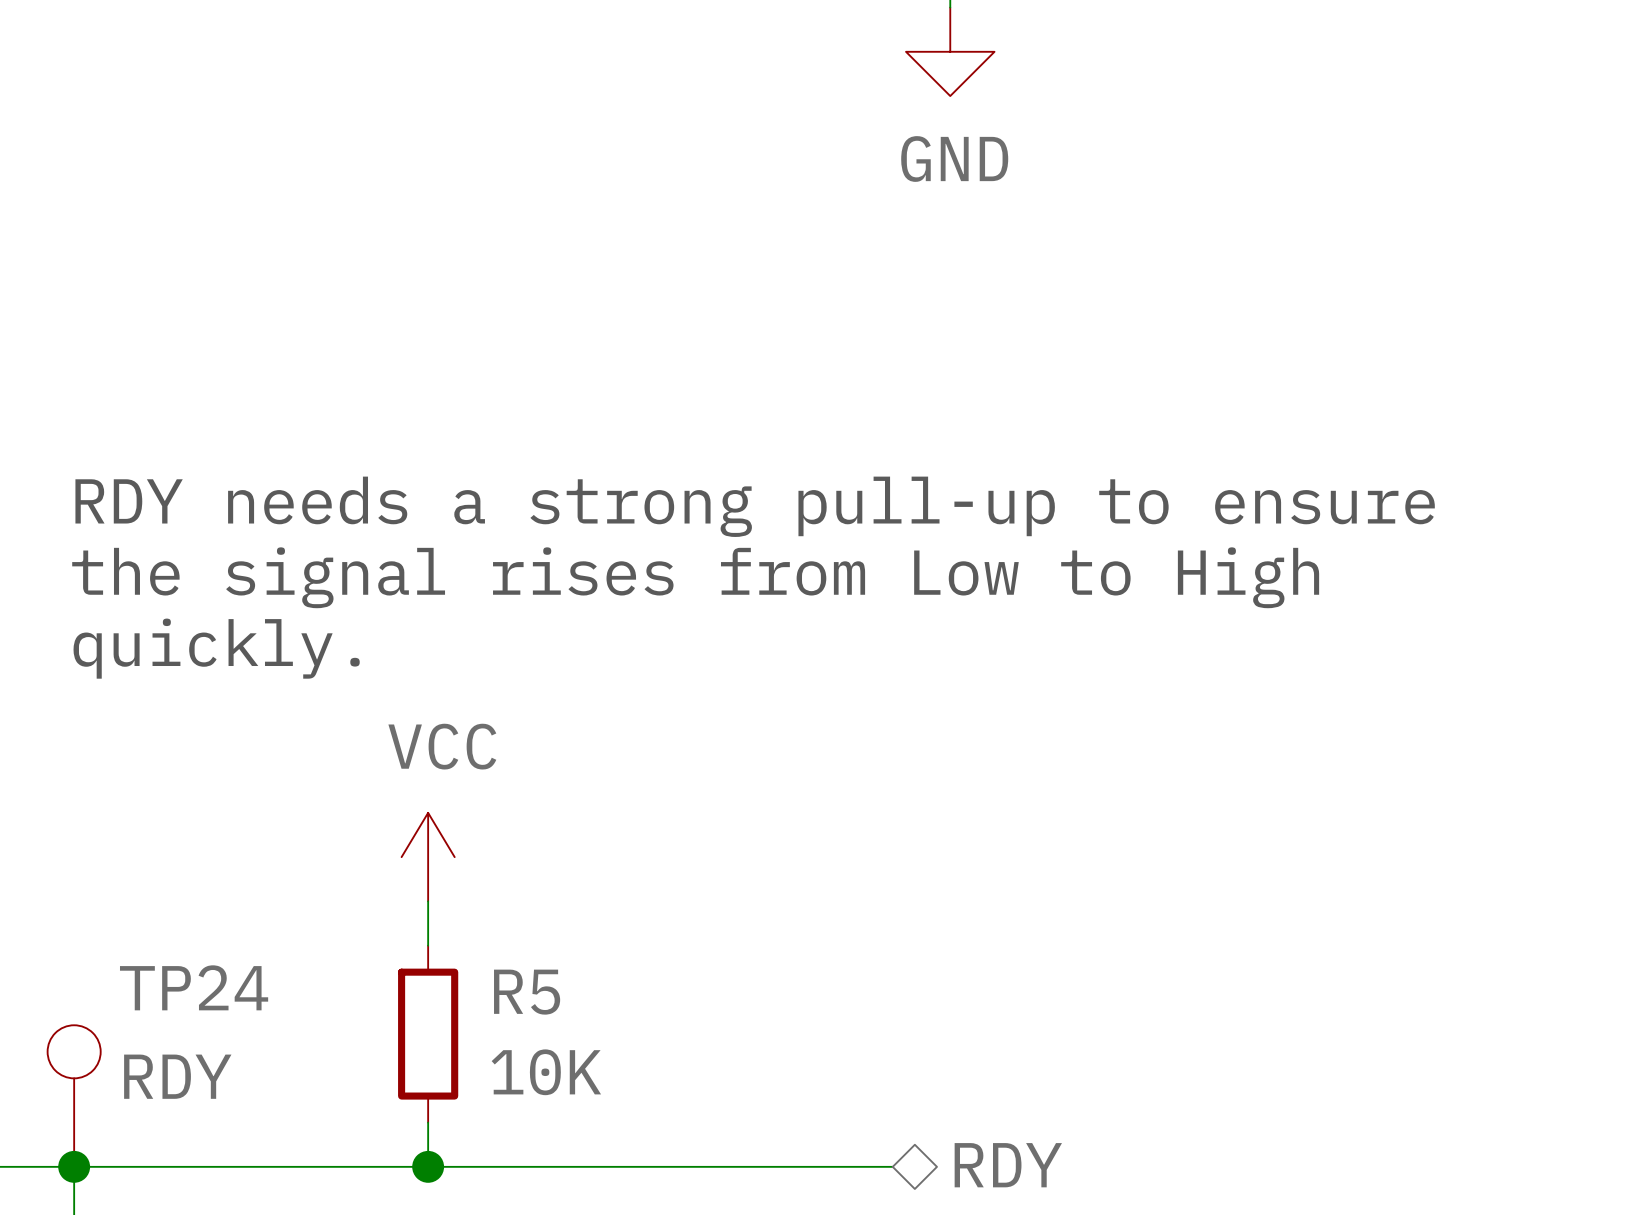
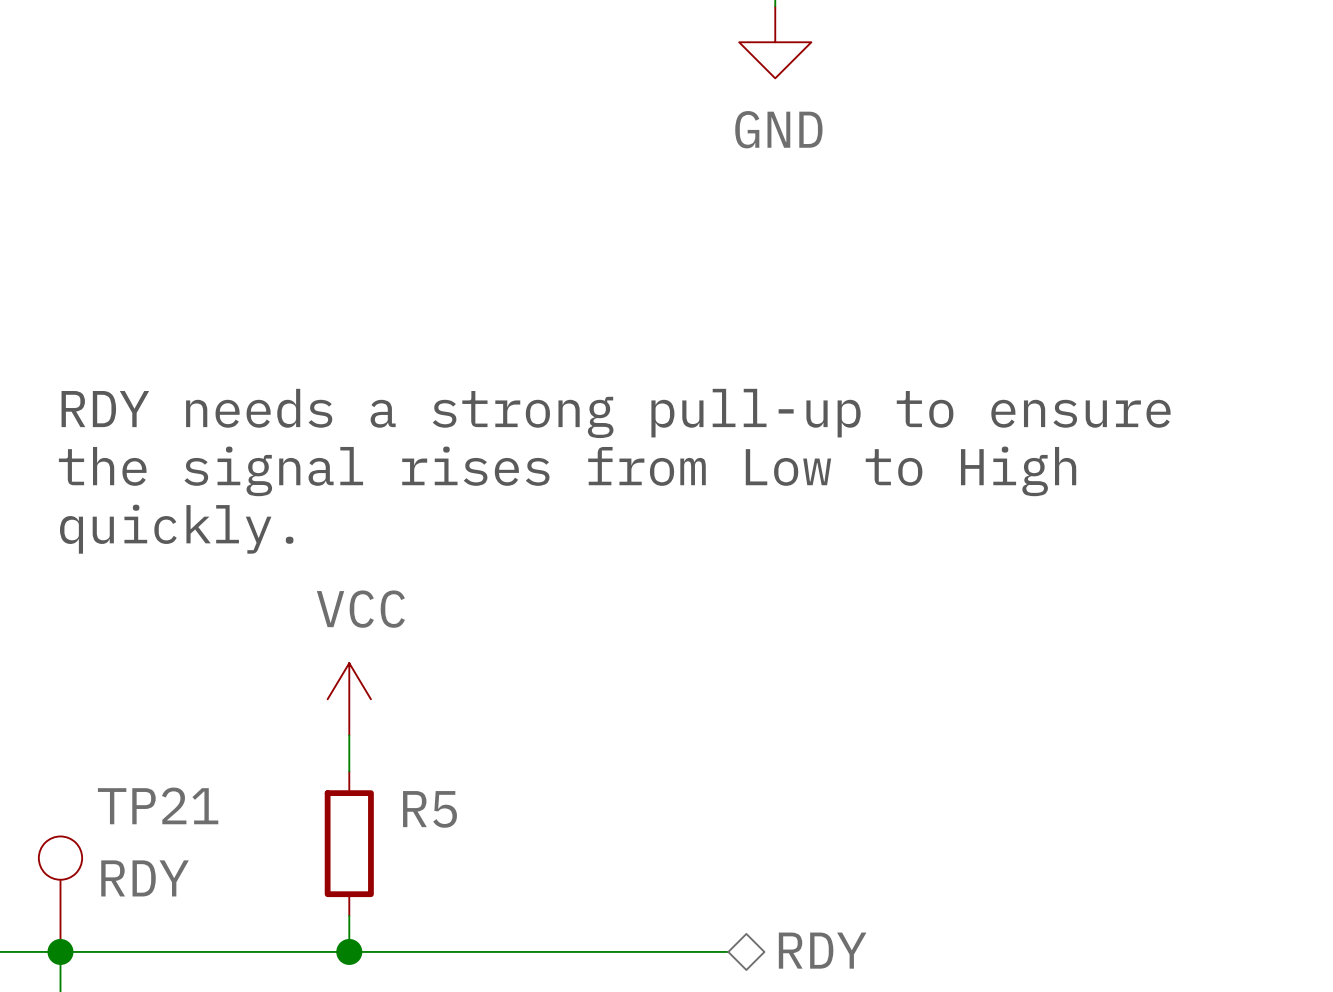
TP24 name: TP24 (194, 987) -> TP21 (158, 805)
R5 value: 10K (546, 1072) -> none

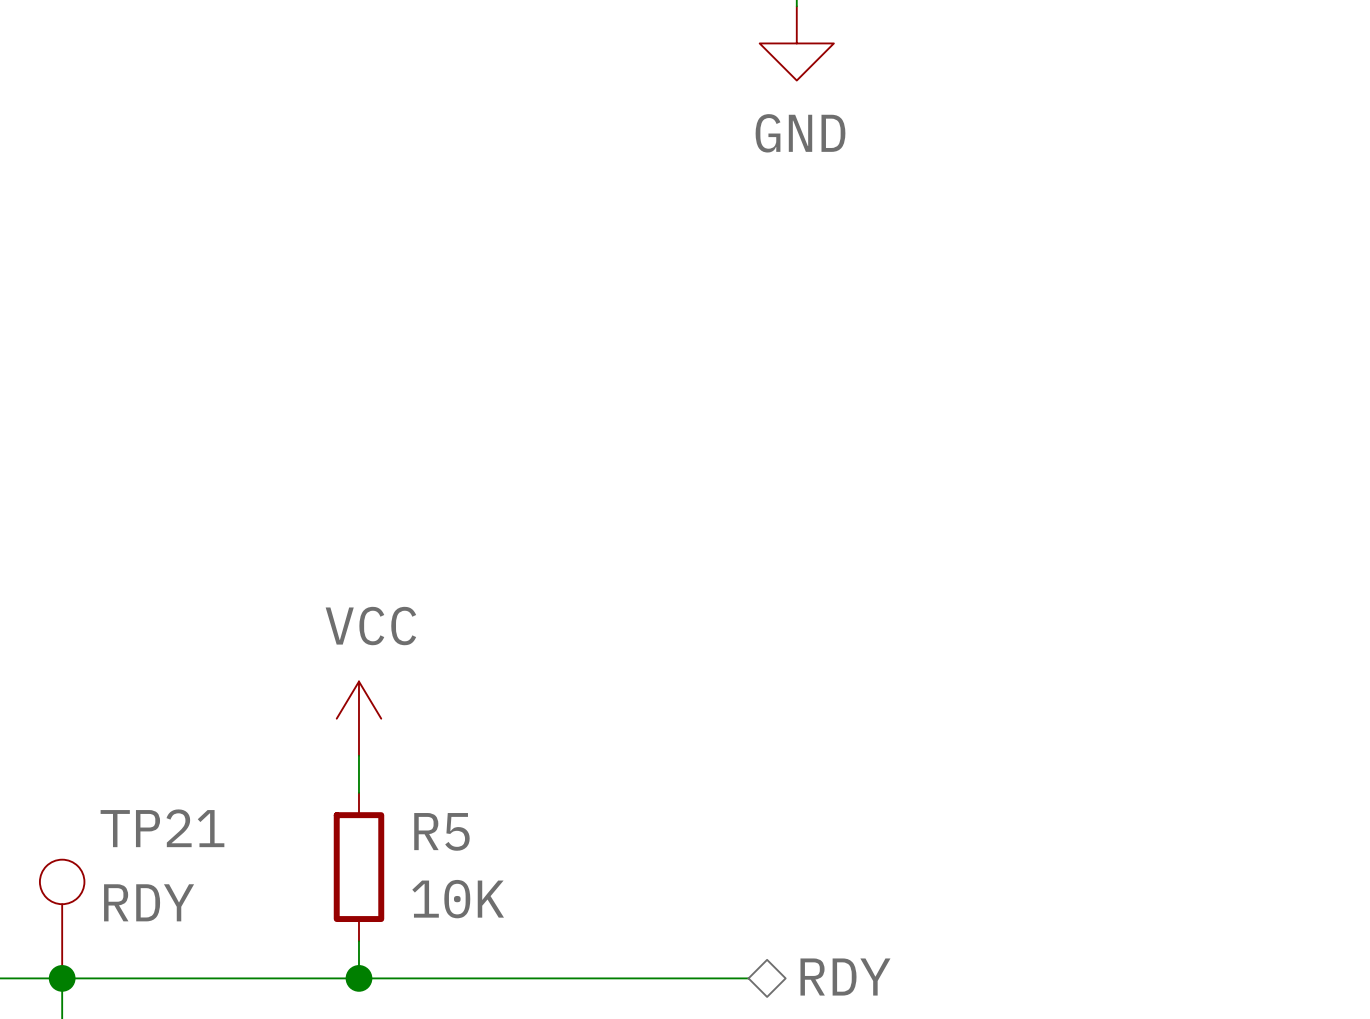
text: RDY needs a strong pull-up to ensure (616, 413) -> none
text: the signal rises from Low to High (567, 471) -> none
text: quickly. (176, 529) -> none
R5 value: none -> 10K (458, 899)

